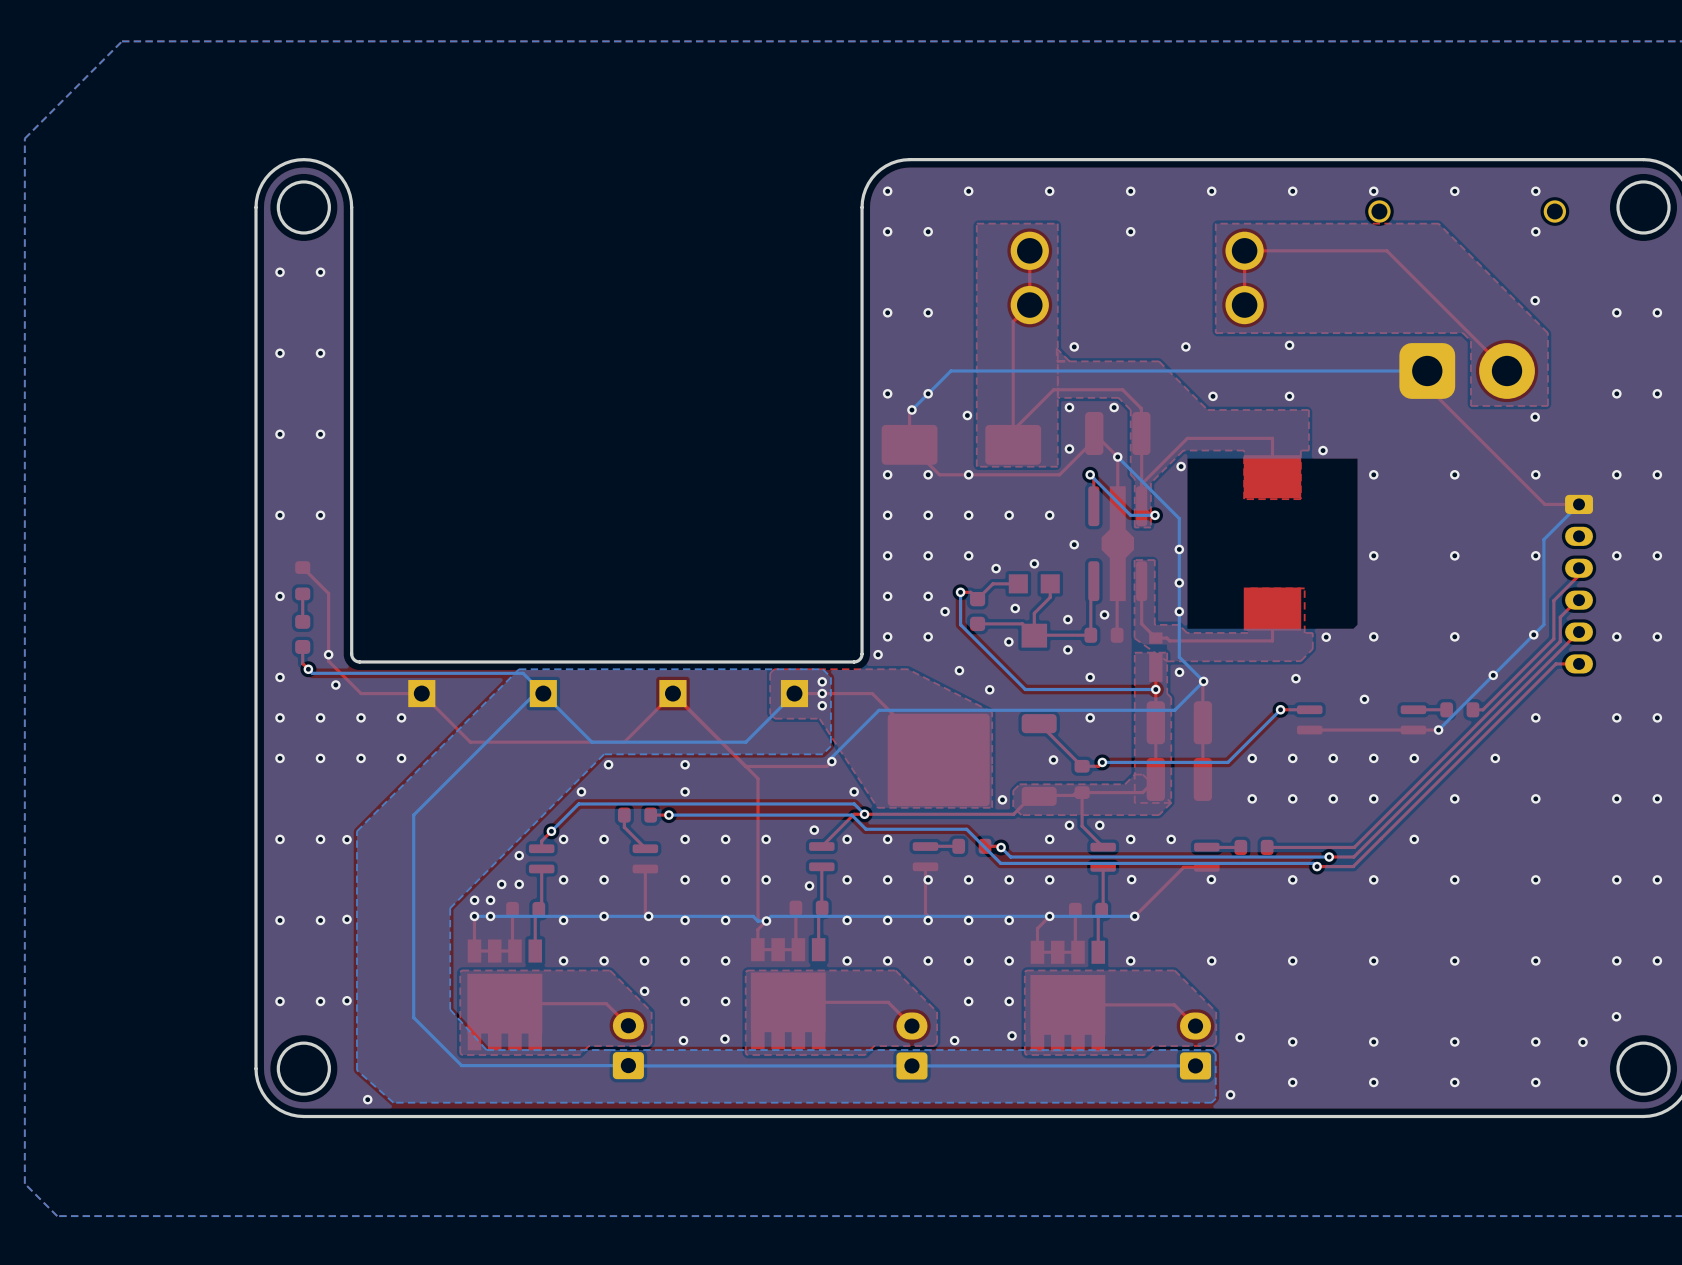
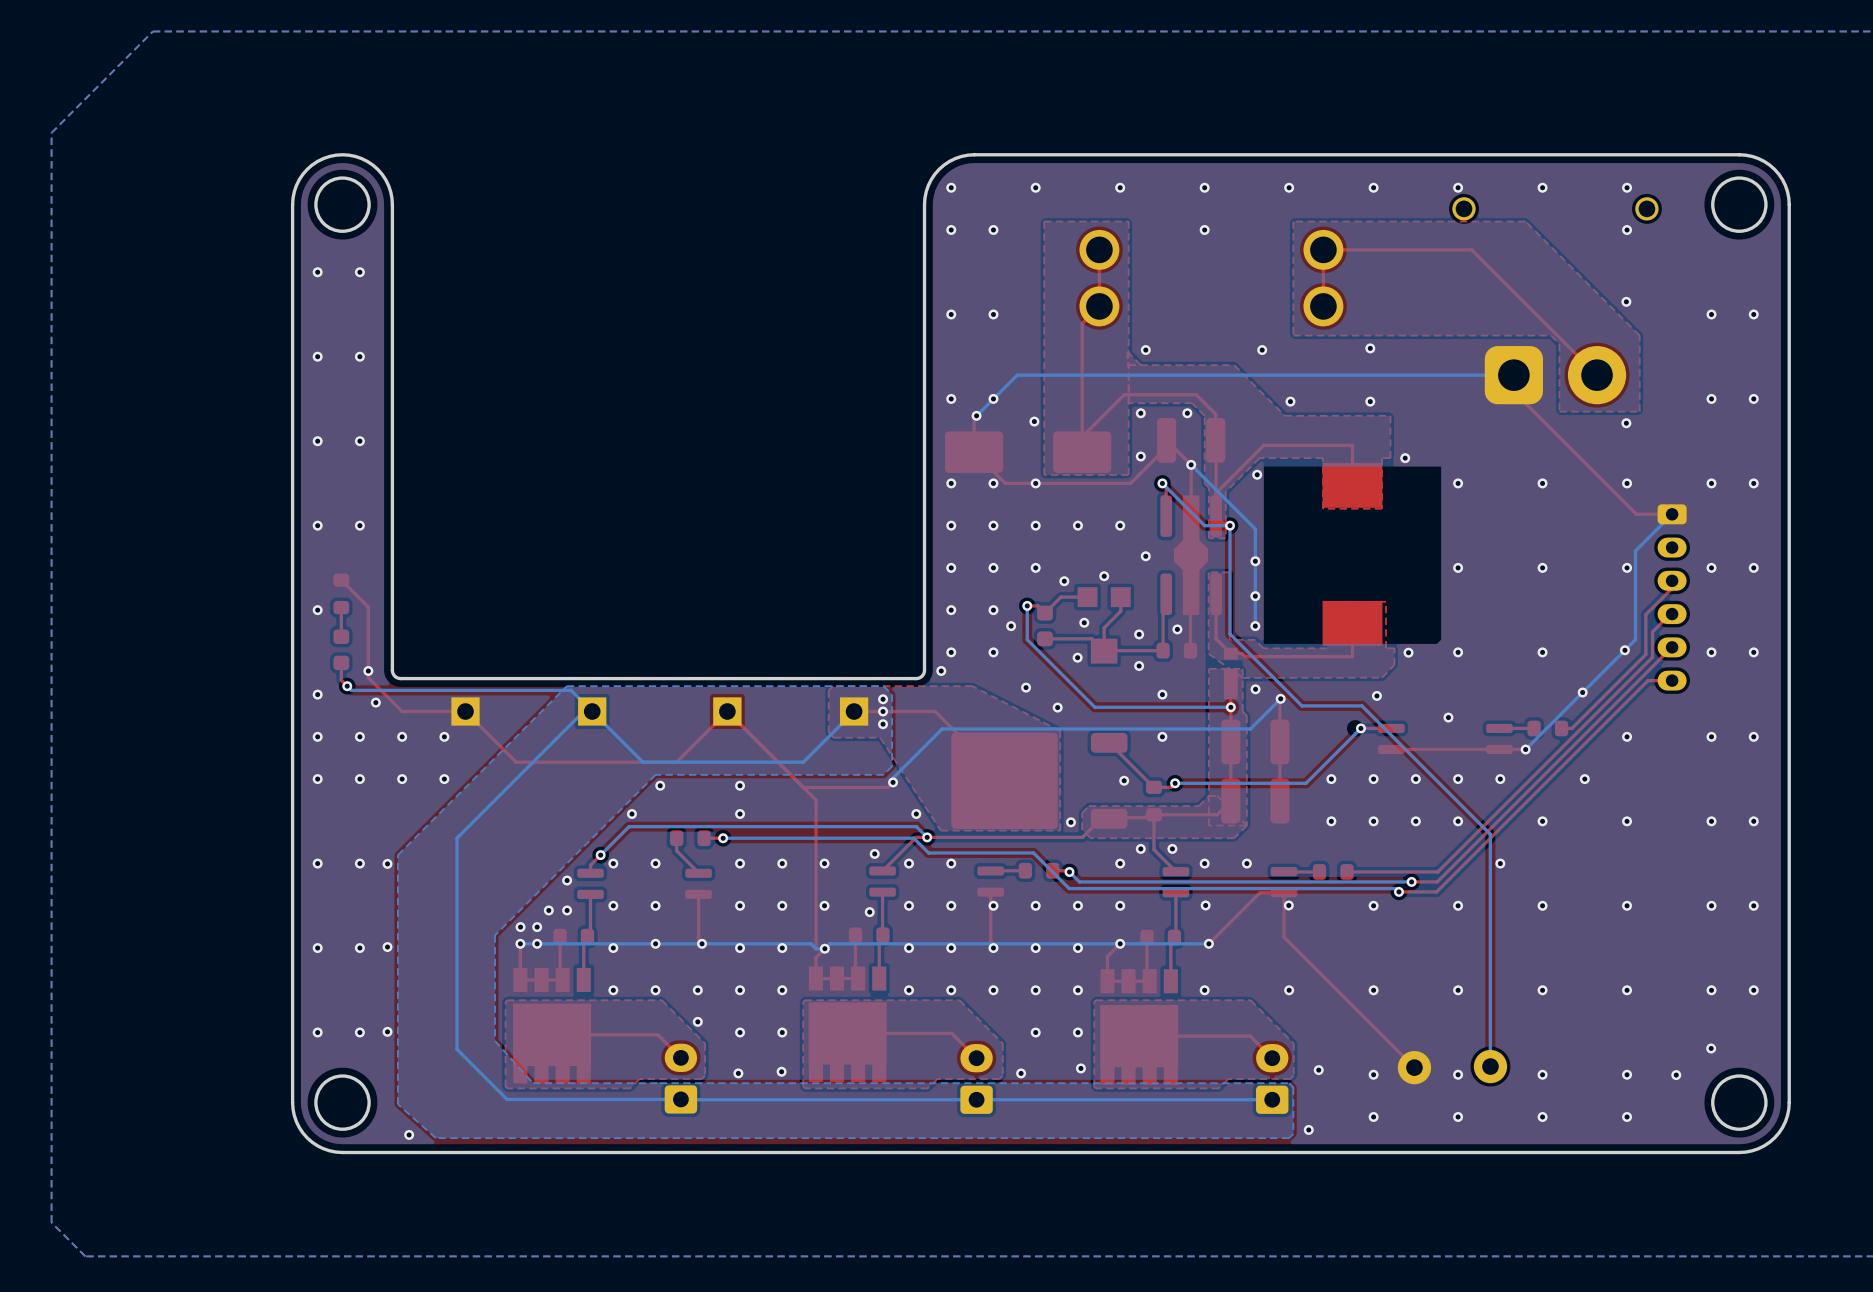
bottom track: none -> (1230, 525) (1230, 634) (1301, 705) (1361, 705) (1490, 834) (1490, 1066)
bottom track: (1179, 611) (1179, 657) (1203, 681) -> none
top track: none -> (1284, 892) (1284, 937) (1414, 1067)
part: none -> (1490, 1066)
part: none -> (1414, 1067)

